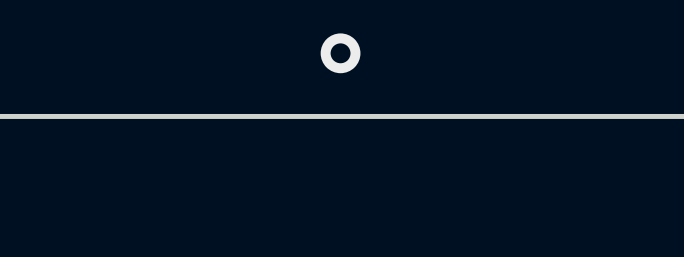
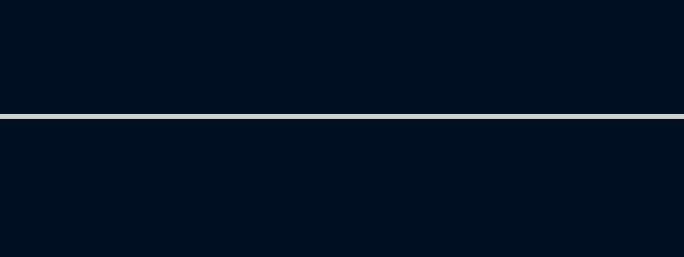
via: (340, 53) -> none

